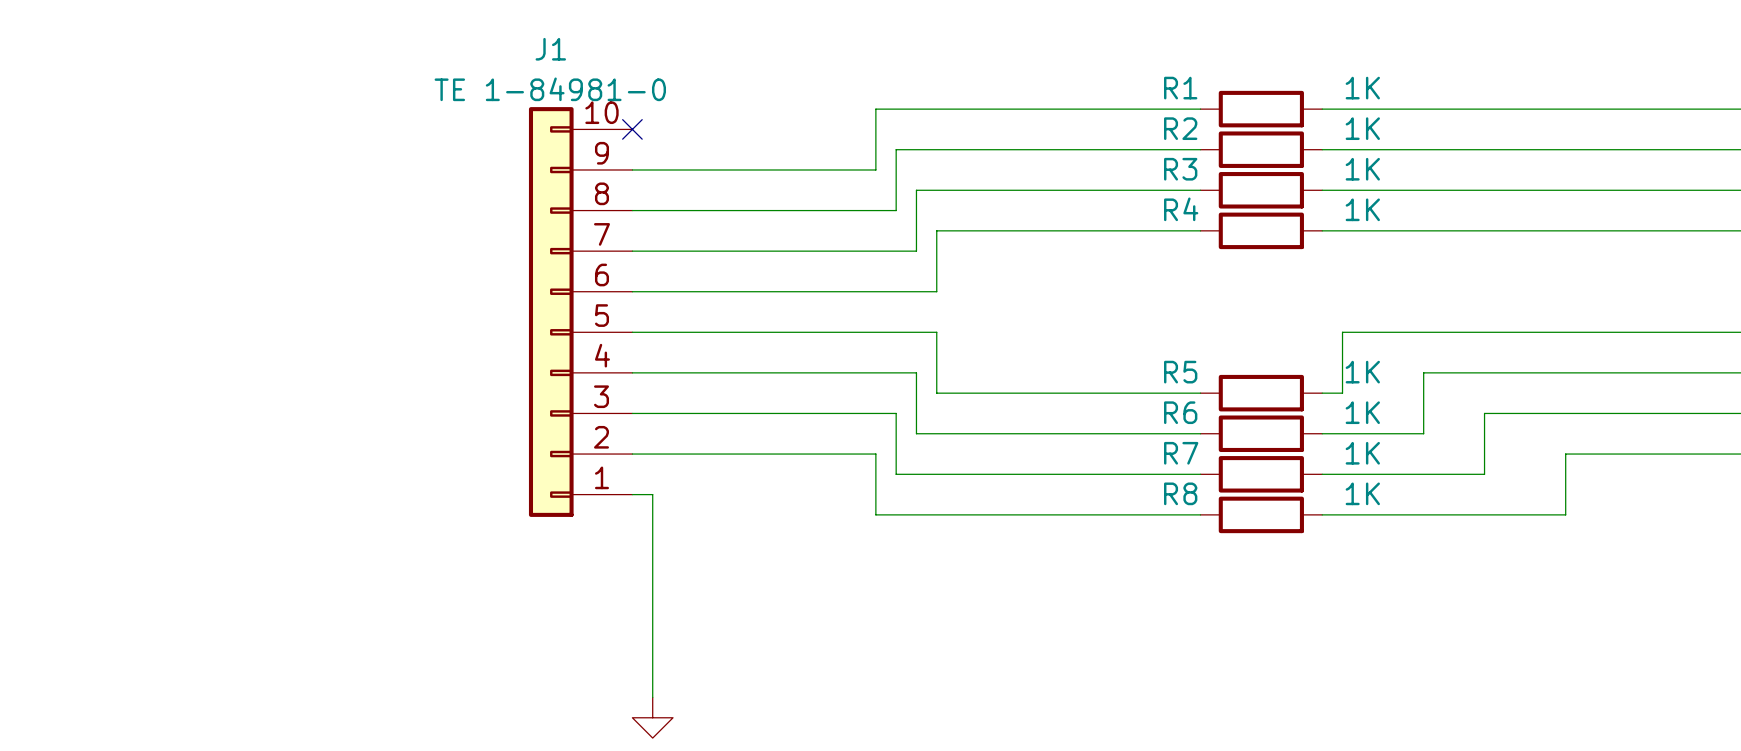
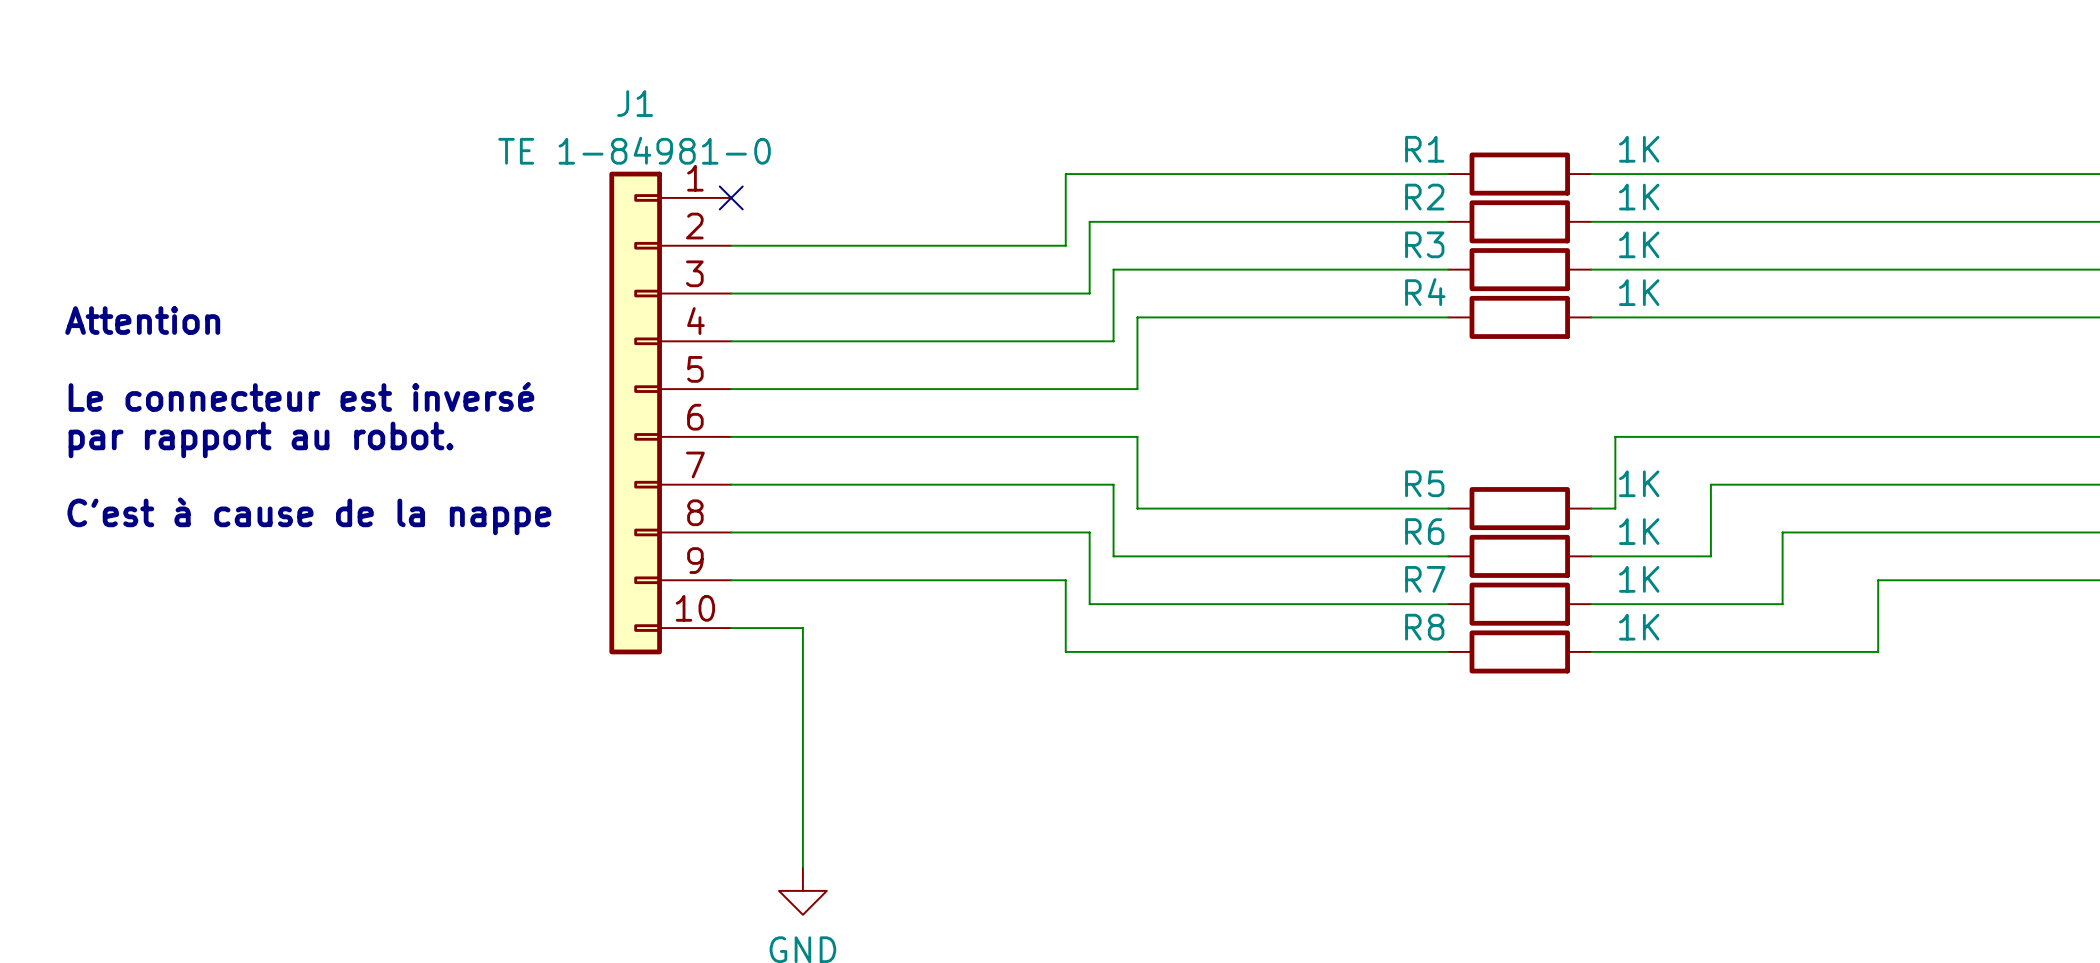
no-connect mark position: (632, 129) -> (731, 197)
text: none -> Attention (142, 320)
text: none -> Le connecteur est inversé (301, 396)
J1 flip: as is (551, 312) -> up-down (635, 413)
text: none -> par rapport au robot. (261, 439)
text: none -> C'est à cause de la nappe (309, 516)

